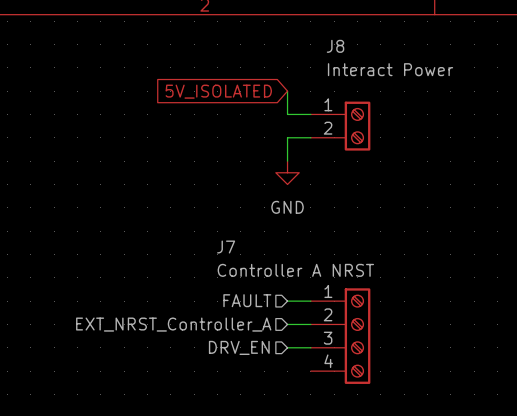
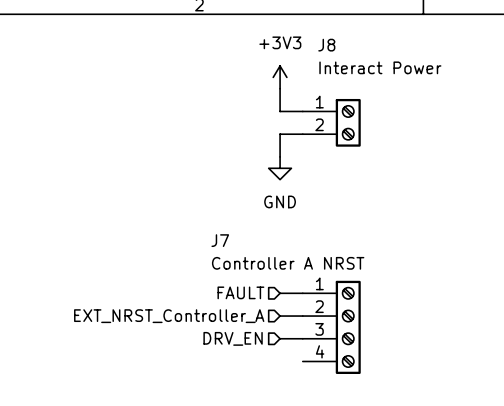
power symbol: none -> +3V3 (280, 77)
global label: 5V_ISOLATED (218, 91) -> none

